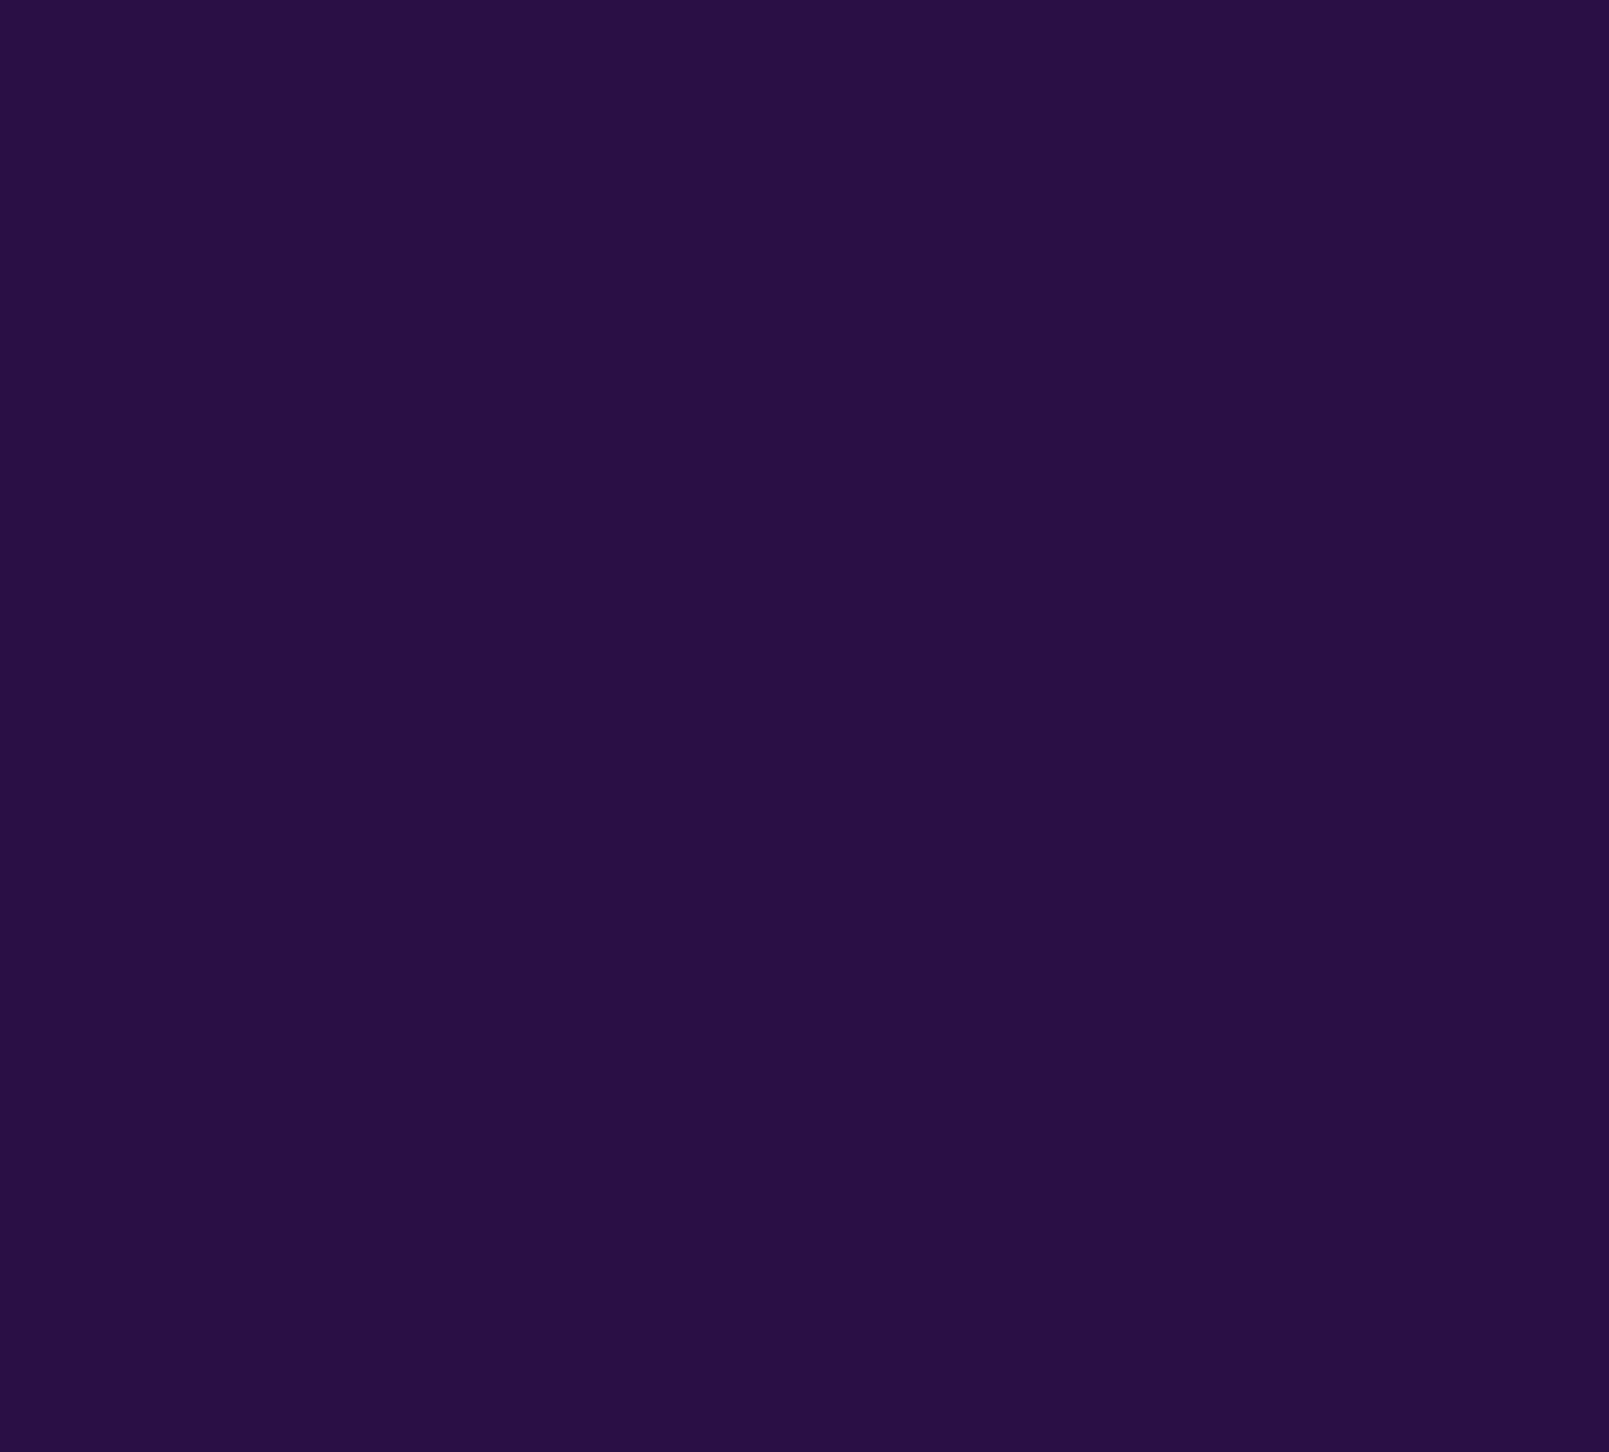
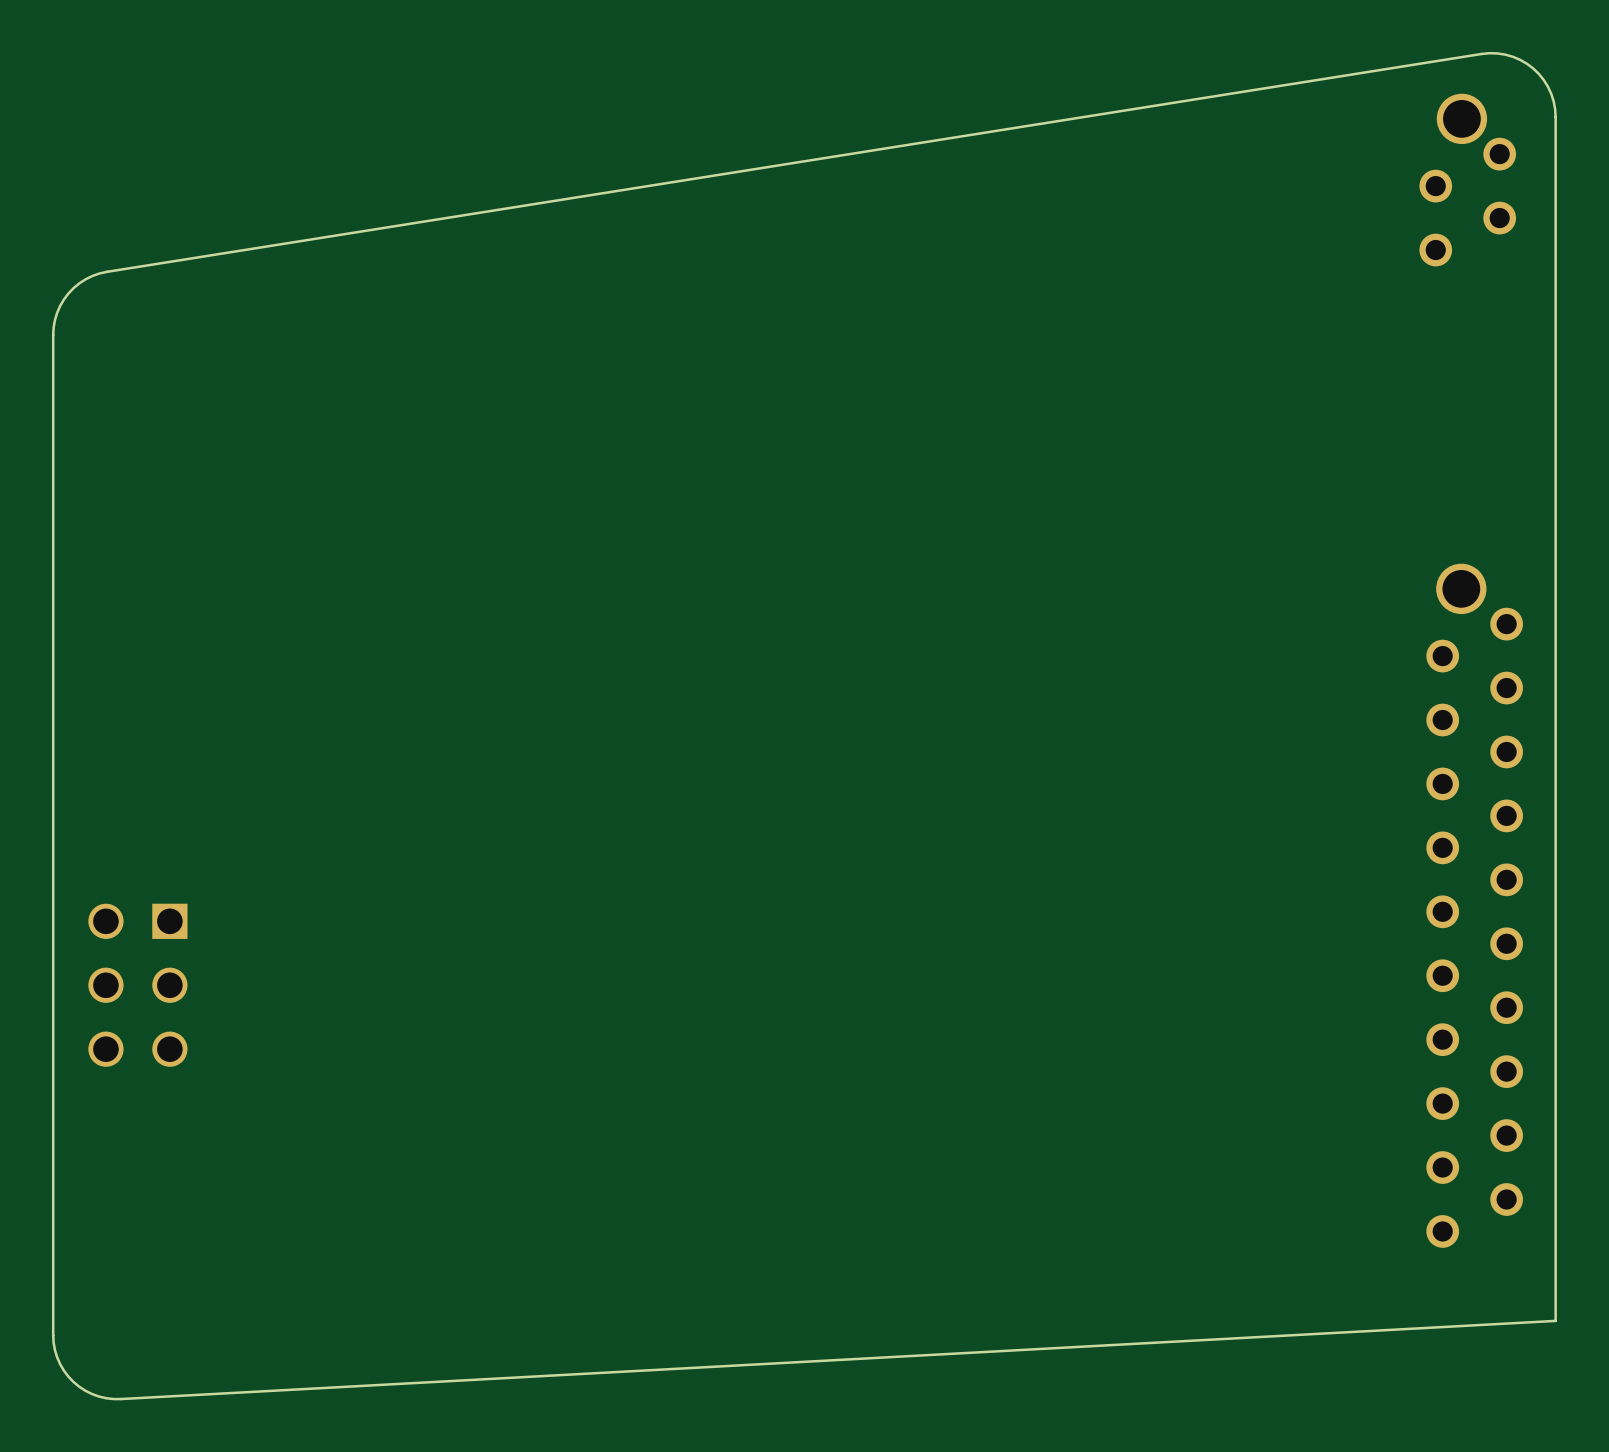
part: none -> (1467, 180)
board edge: none -> (107, 271) (1481, 53) (1505, 54) (1526, 63) (1538, 73) (1547, 86) (1553, 101) (1555, 117) (1555, 1320) (121, 1399) (99, 1396) (85, 1390) (73, 1381) (60, 1364) (54, 1350) (53, 1335)
board edge: none -> (107, 271) (85, 279) (68, 293) (57, 312) (53, 334) (53, 1335)
part: none -> (1474, 905)
part: none -> (137, 985)

